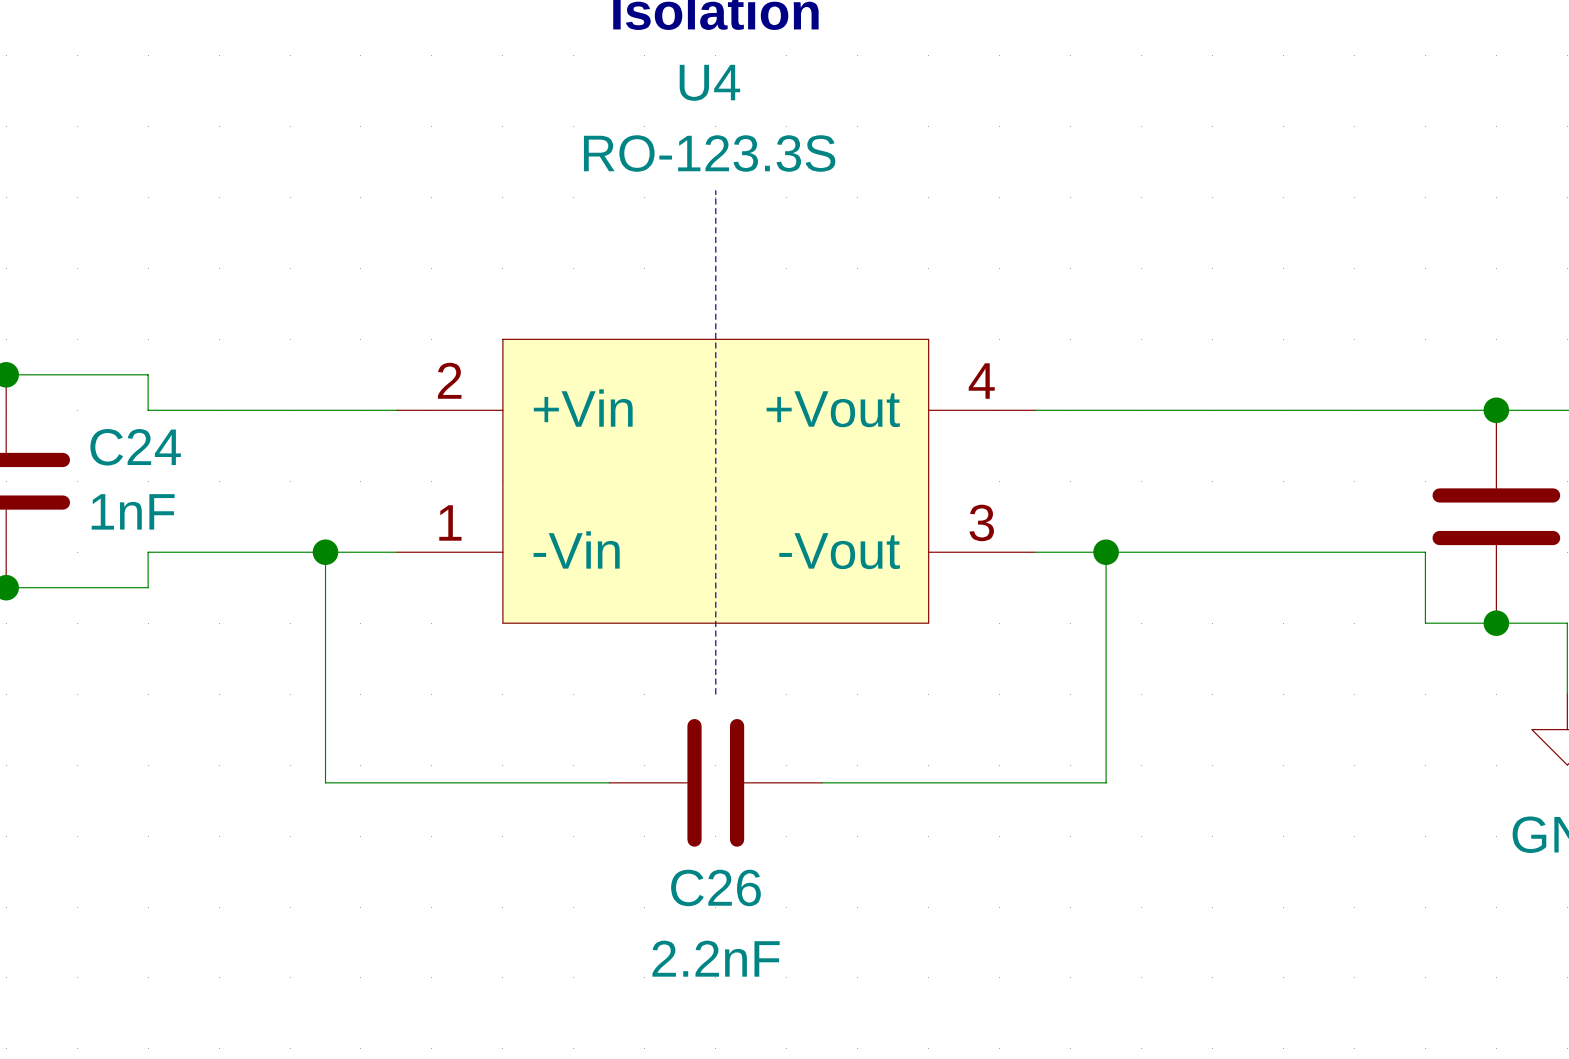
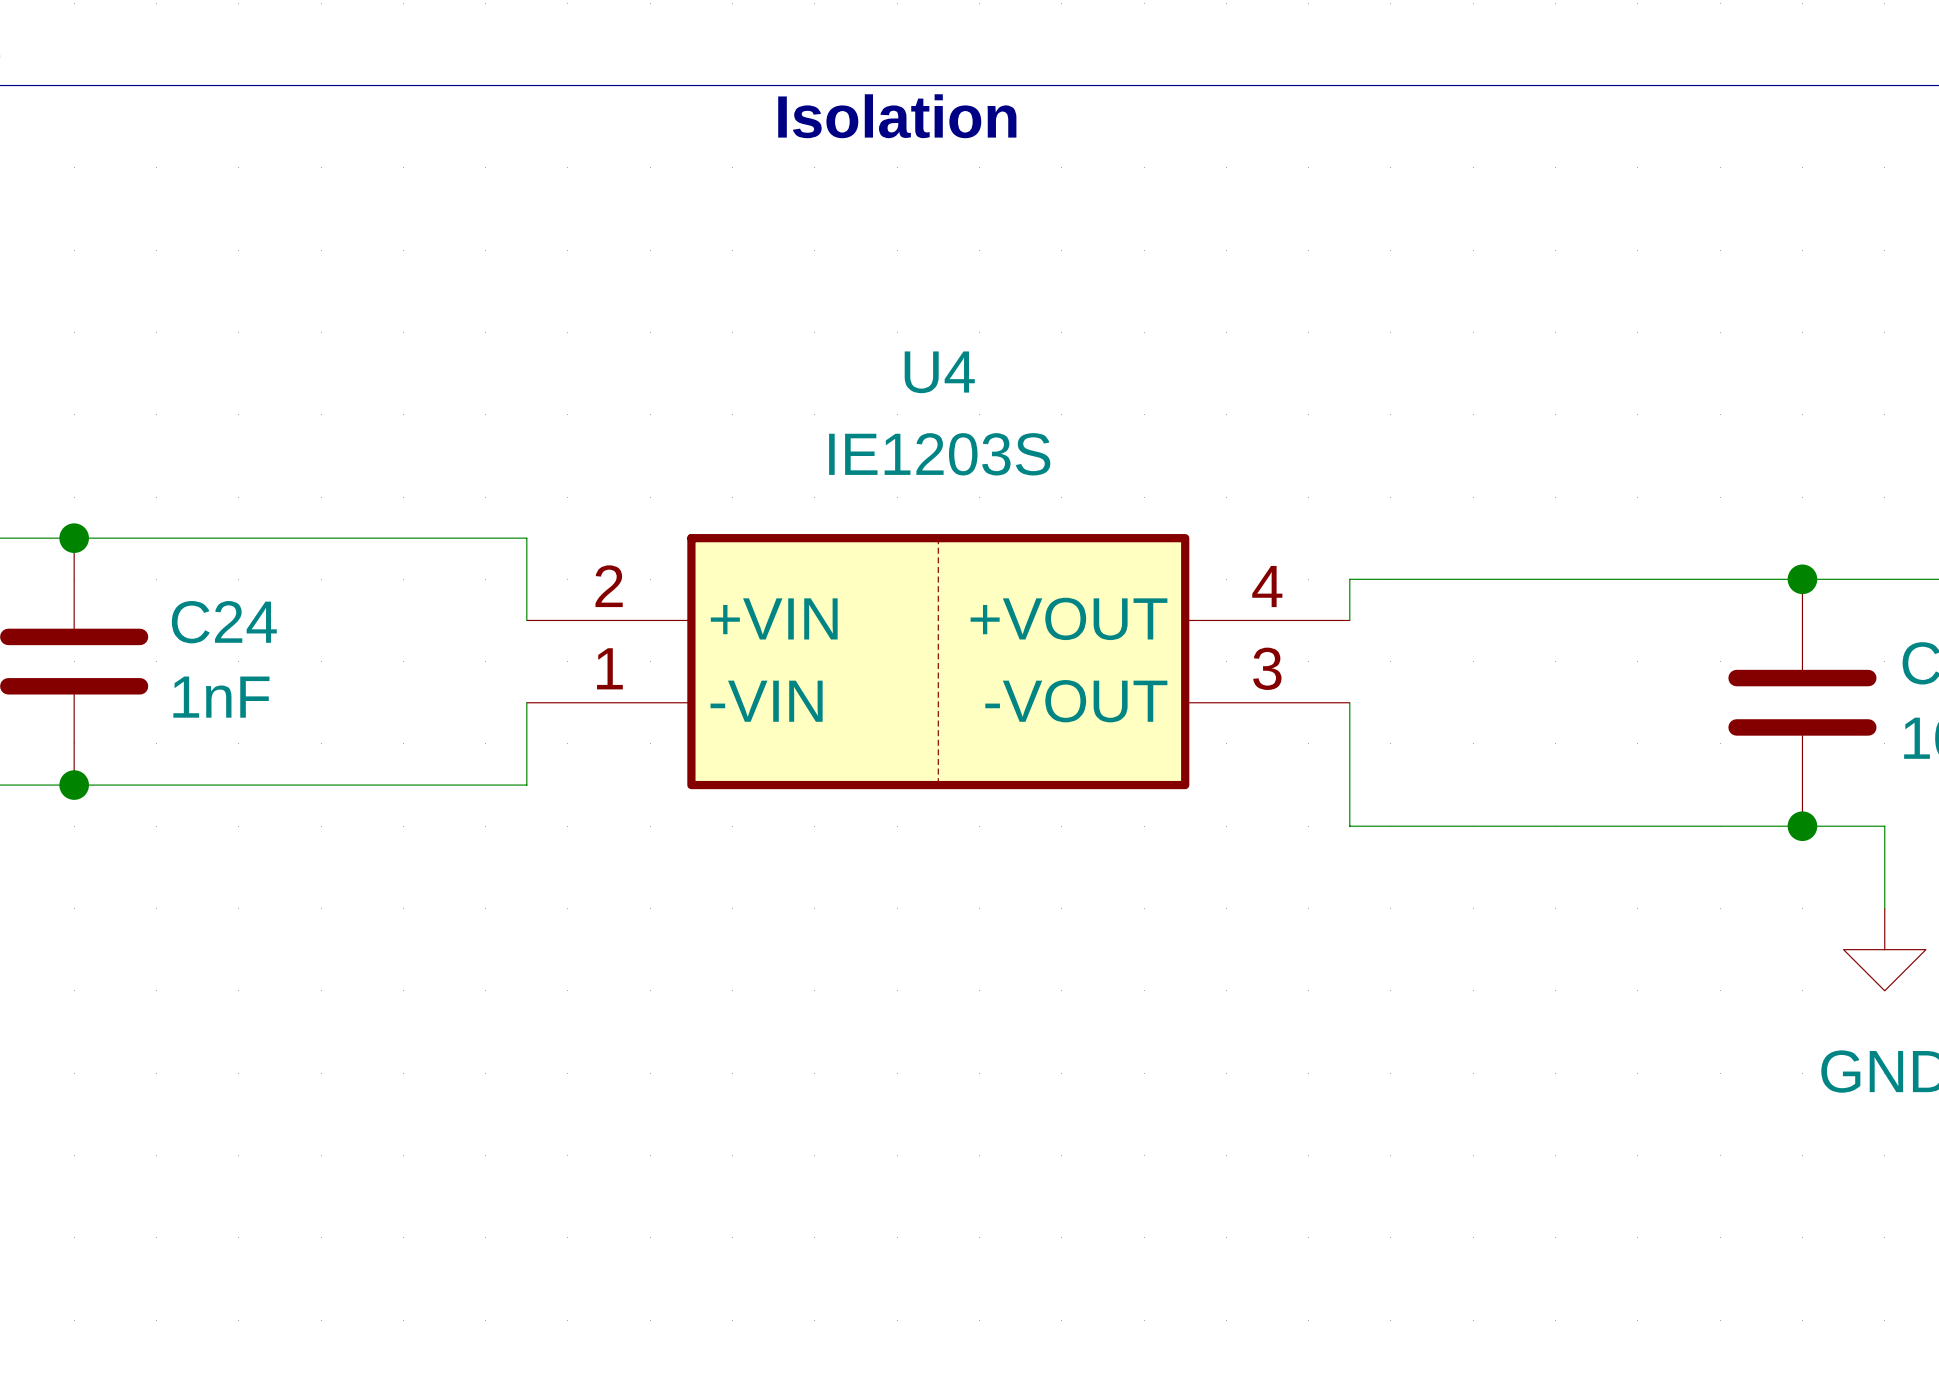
U4 name position: U4 (709, 82) -> U4 (939, 372)
U4 value: RO-123.3S (709, 153) -> IE1203S (939, 454)
line: (715, 190) (715, 694) -> none
U4 symbol: [396, 339, 1036, 624] -> [526, 534, 1350, 790]
wire: (148, 374) (148, 410) (396, 410) -> (238, 538) (526, 538) (526, 620)
wire: (1035, 410) (1106, 410) -> (1349, 620) (1349, 579)
wire: none -> (1349, 702) (1349, 743)
wire: (325, 552) (325, 782) (609, 782) -> none
junction: (325, 552) -> none
wire: (396, 552) (148, 552) (148, 587) -> (526, 702) (526, 785) (238, 785)
wire: (1035, 552) (1425, 552) (1425, 623) -> (1349, 826) (1720, 826)
junction: (1106, 552) -> none
wire: (1106, 623) (1106, 782) (822, 782) -> none
C26: 2.2nF (715, 782) -> none

